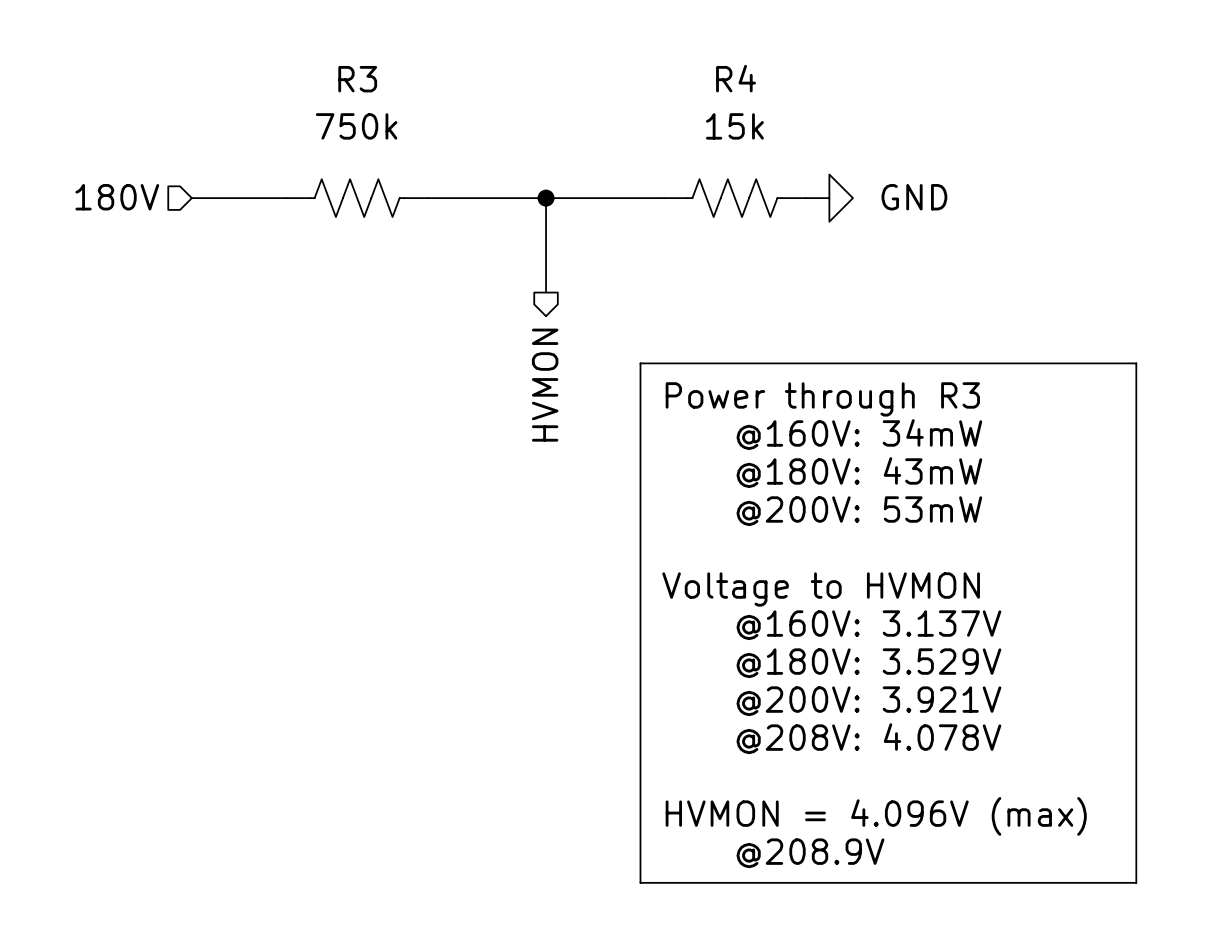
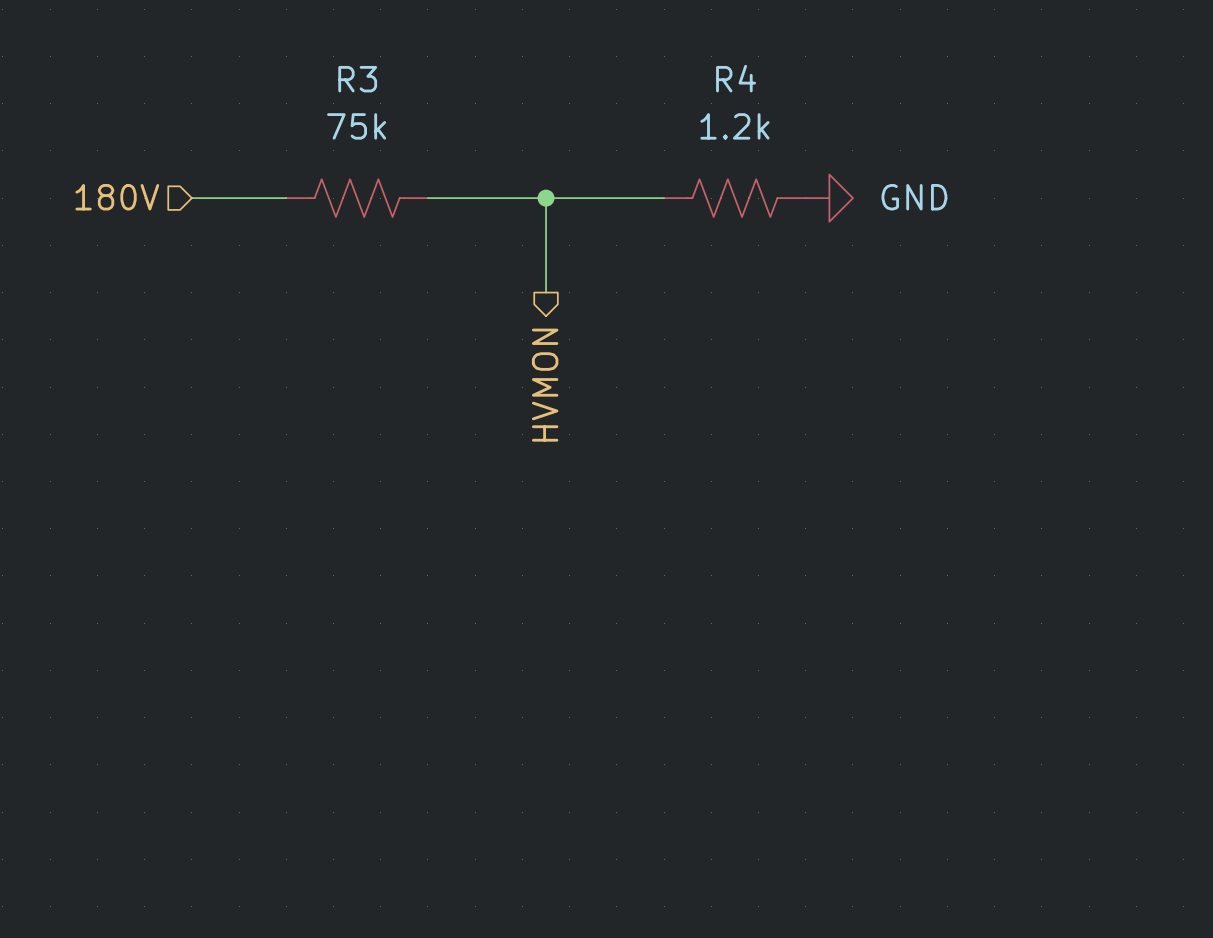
R3 value: 750k (356, 126) -> 75k (356, 126)
R4 value: 15k (734, 126) -> 1.2k (734, 126)
line: (640, 363) (1136, 363) (1136, 882) (640, 882) (640, 363) -> none
text: Power through R3 (822, 399) -> none
text: @160V: 34mW (859, 434) -> none
text: @180V: 43mW (859, 472) -> none
text: @200V: 53mW (859, 511) -> none
text: Voltage to HVMON (821, 589) -> none
text: @160V: 3.137V (868, 625) -> none
text: @180V: 3.529V (868, 663) -> none
text: @200V: 3.921V (868, 701) -> none
text: @208V: 4.078V (868, 738) -> none
text: HVMON = 4.096V (max) (876, 816) -> none
text: @208.9V (810, 853) -> none

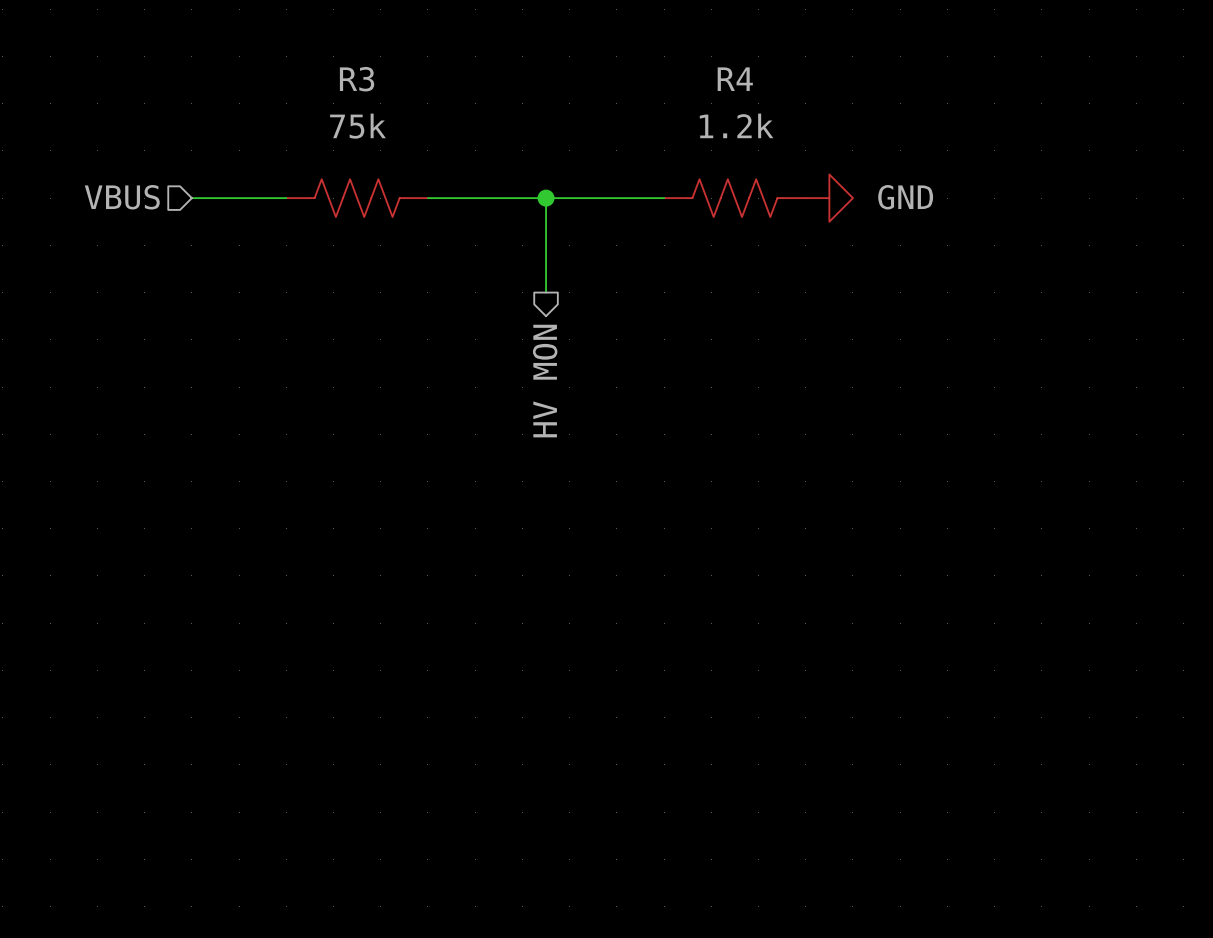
hierarchical label: 180V (117, 197) -> VBUS (122, 197)
hierarchical label: HVMON (545, 385) -> HV MON (545, 381)

